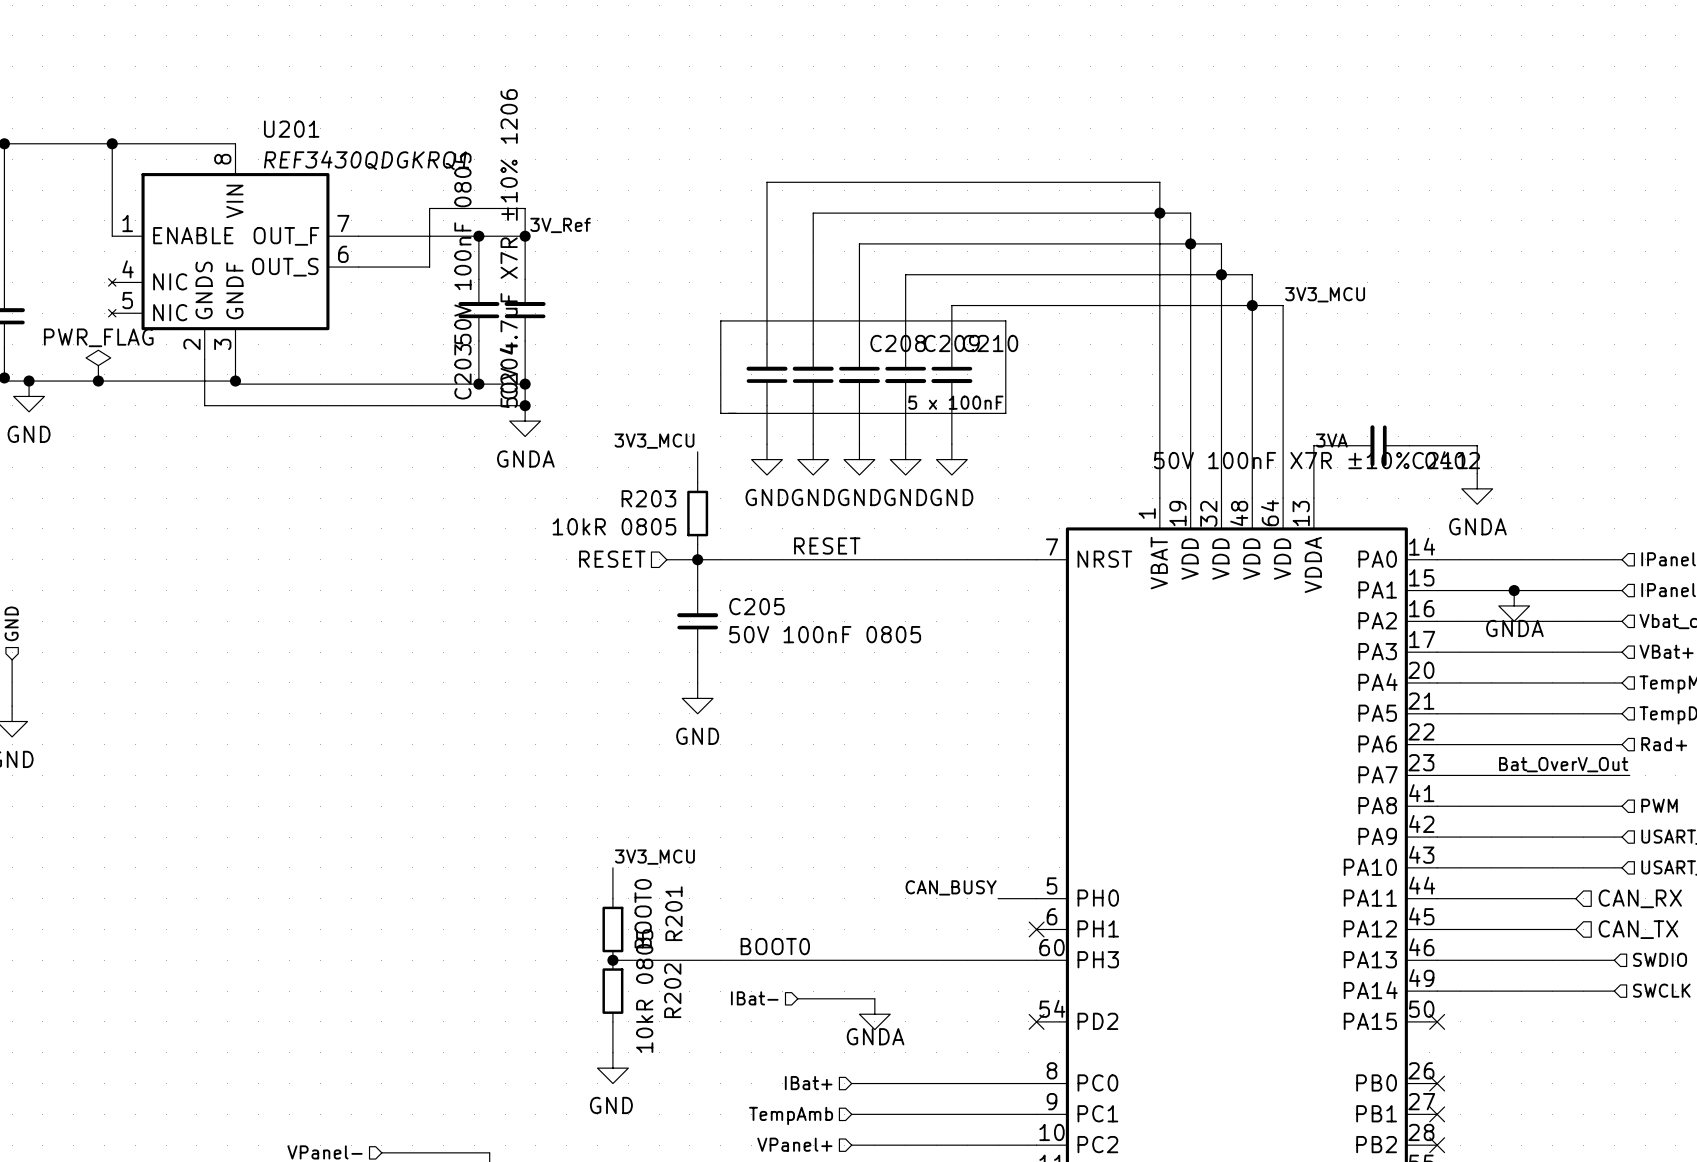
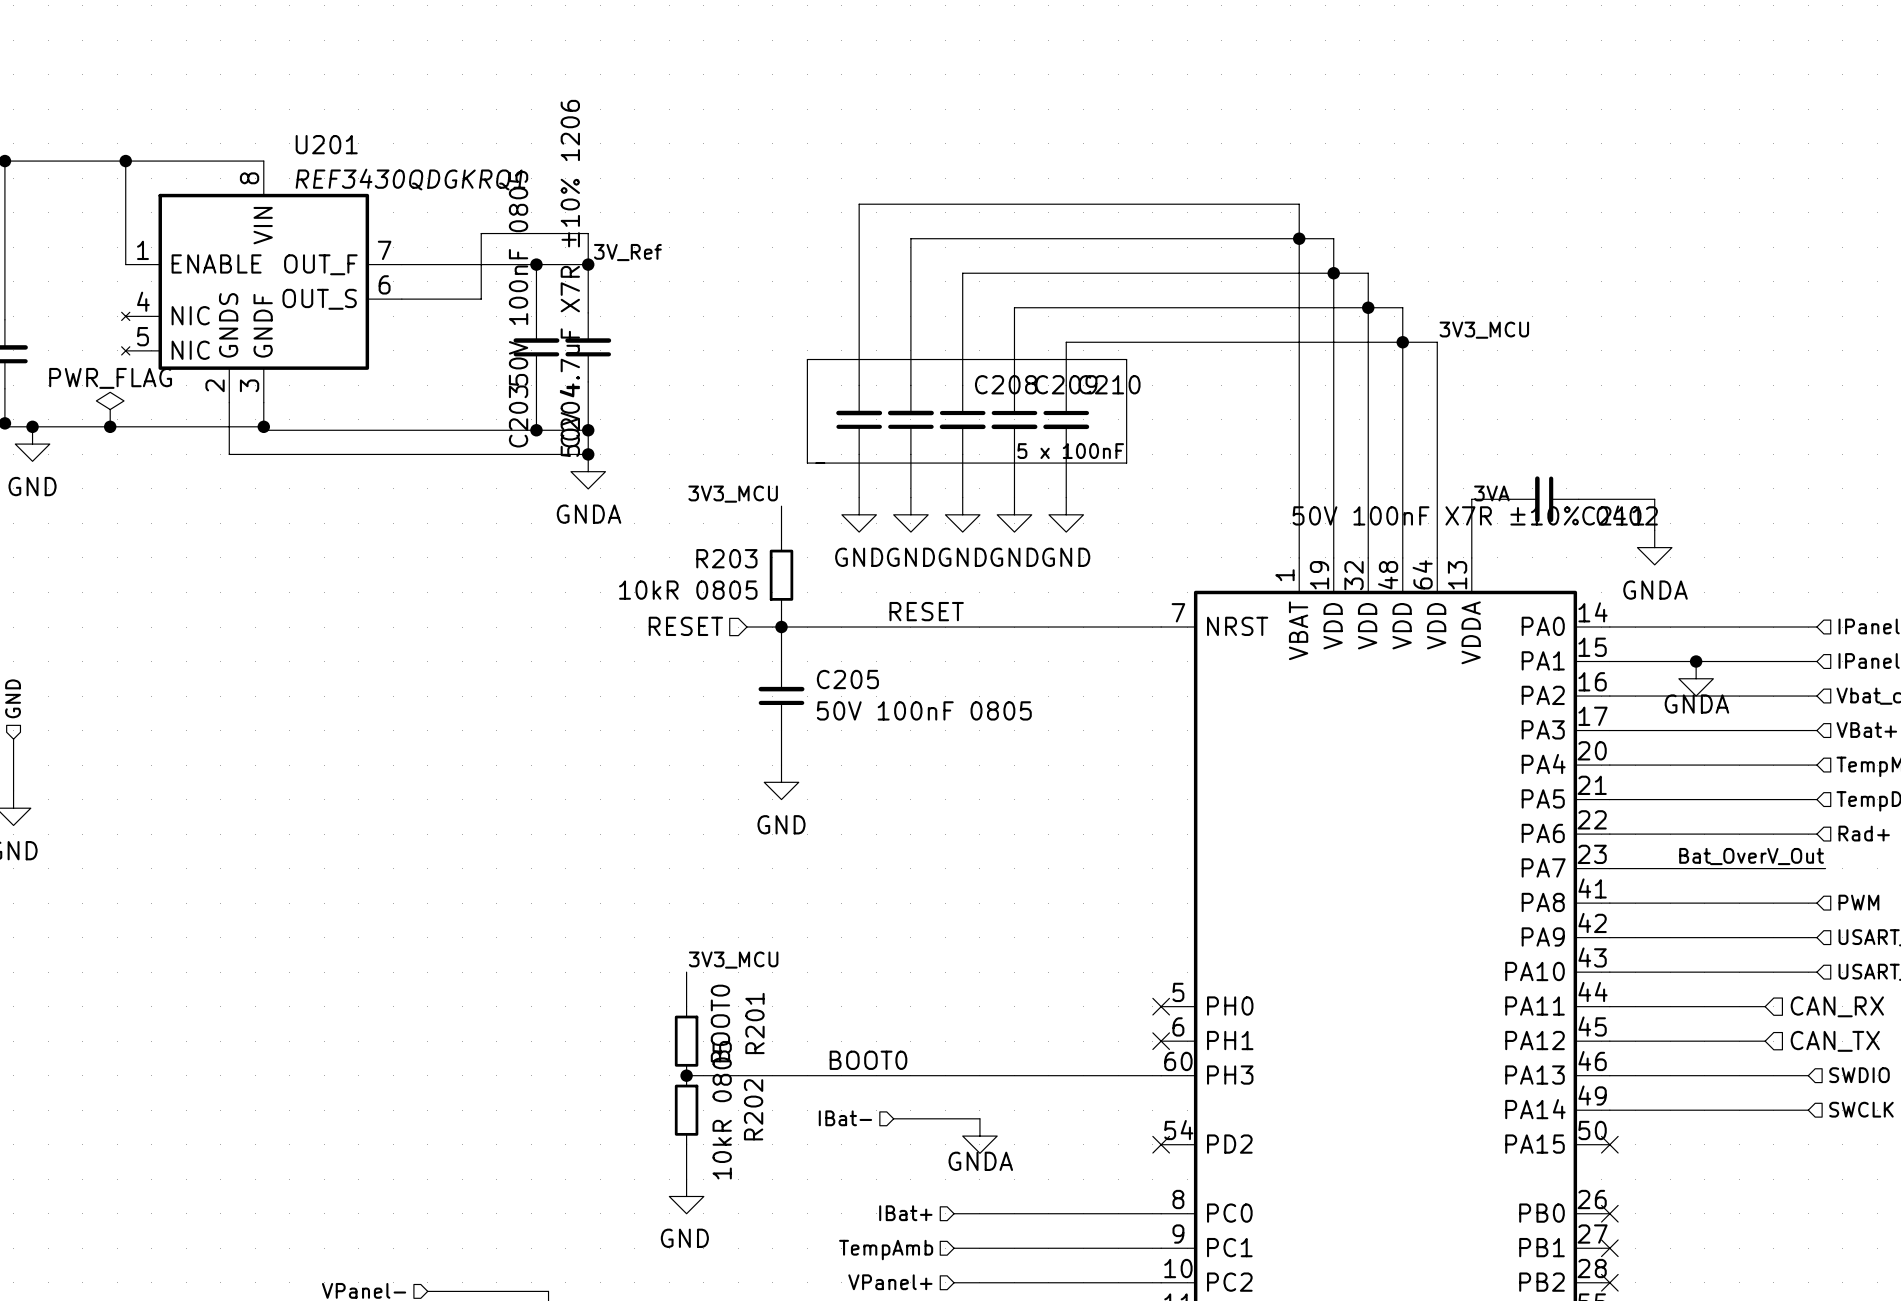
label: CAN_BUSY (951, 887) -> none
wire: (998, 898) (1036, 898) -> none
no-connect mark: none -> (1161, 1006)

